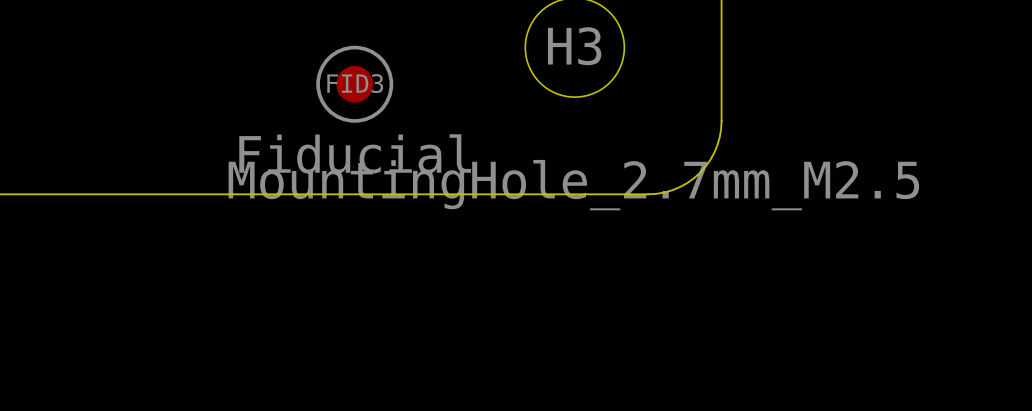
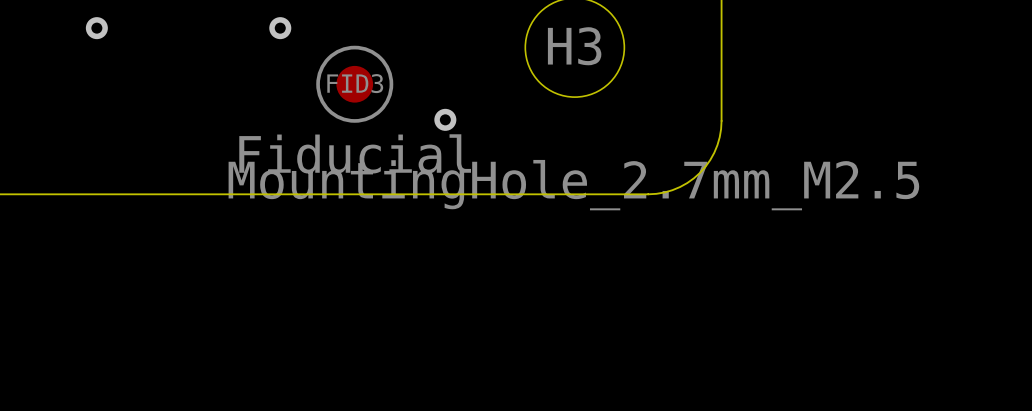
via: none -> (96, 28)
via: none -> (280, 28)
via: none -> (445, 119)

